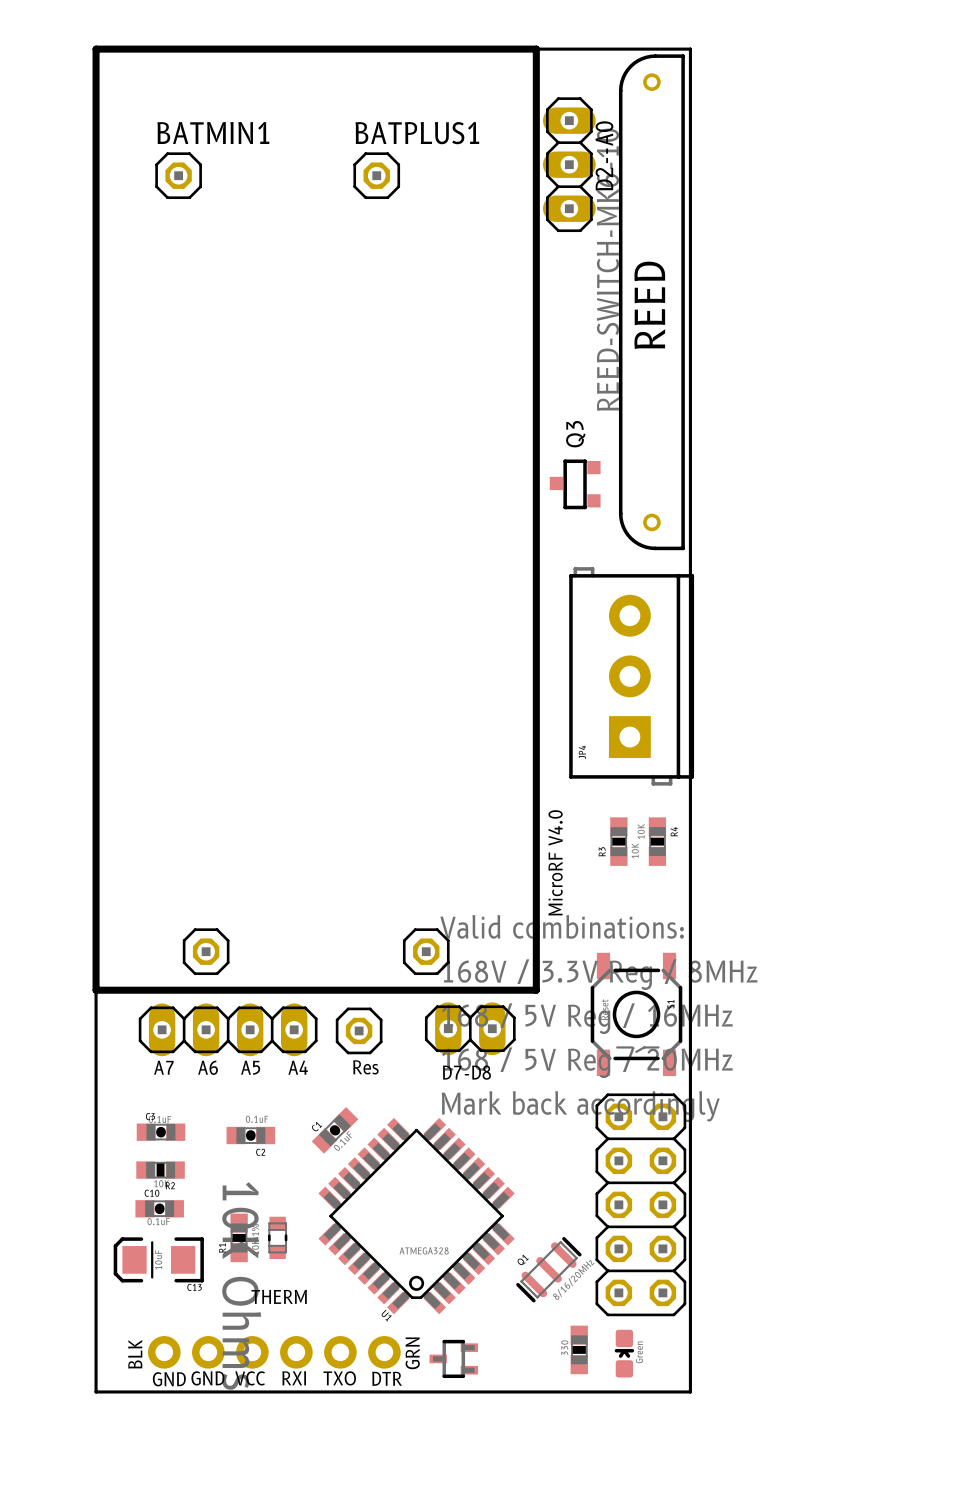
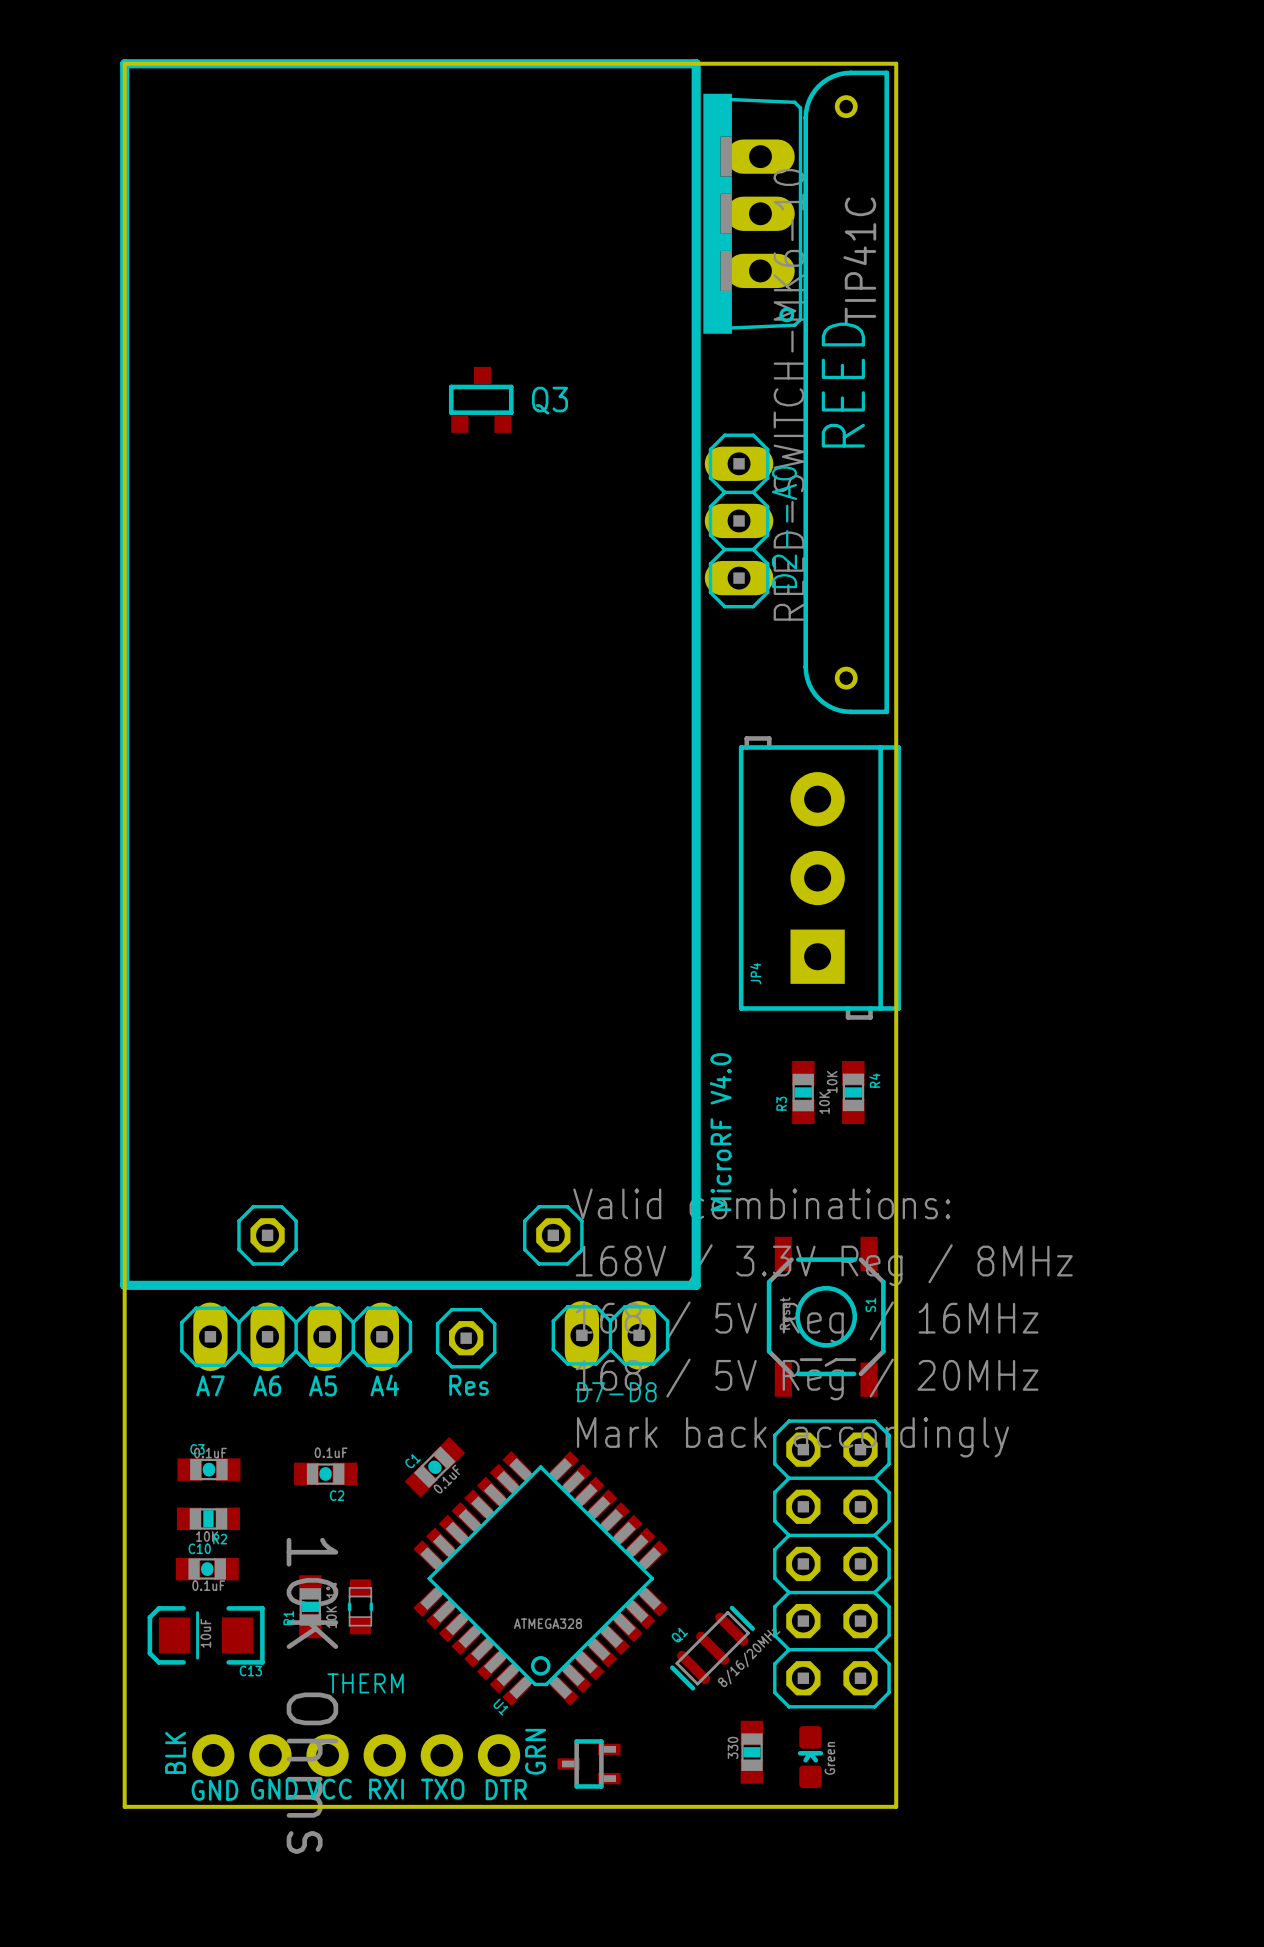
D2--A0 position: (569, 164) -> (739, 520)
part: none -> TIP41C (752, 213)
BATMIN1: (178, 175) -> none
BATPLUS1: (376, 175) -> none
Q3 rotation: 0° (575, 484) -> 90° clockwise (481, 399)
Q3 position: (575, 484) -> (481, 399)

